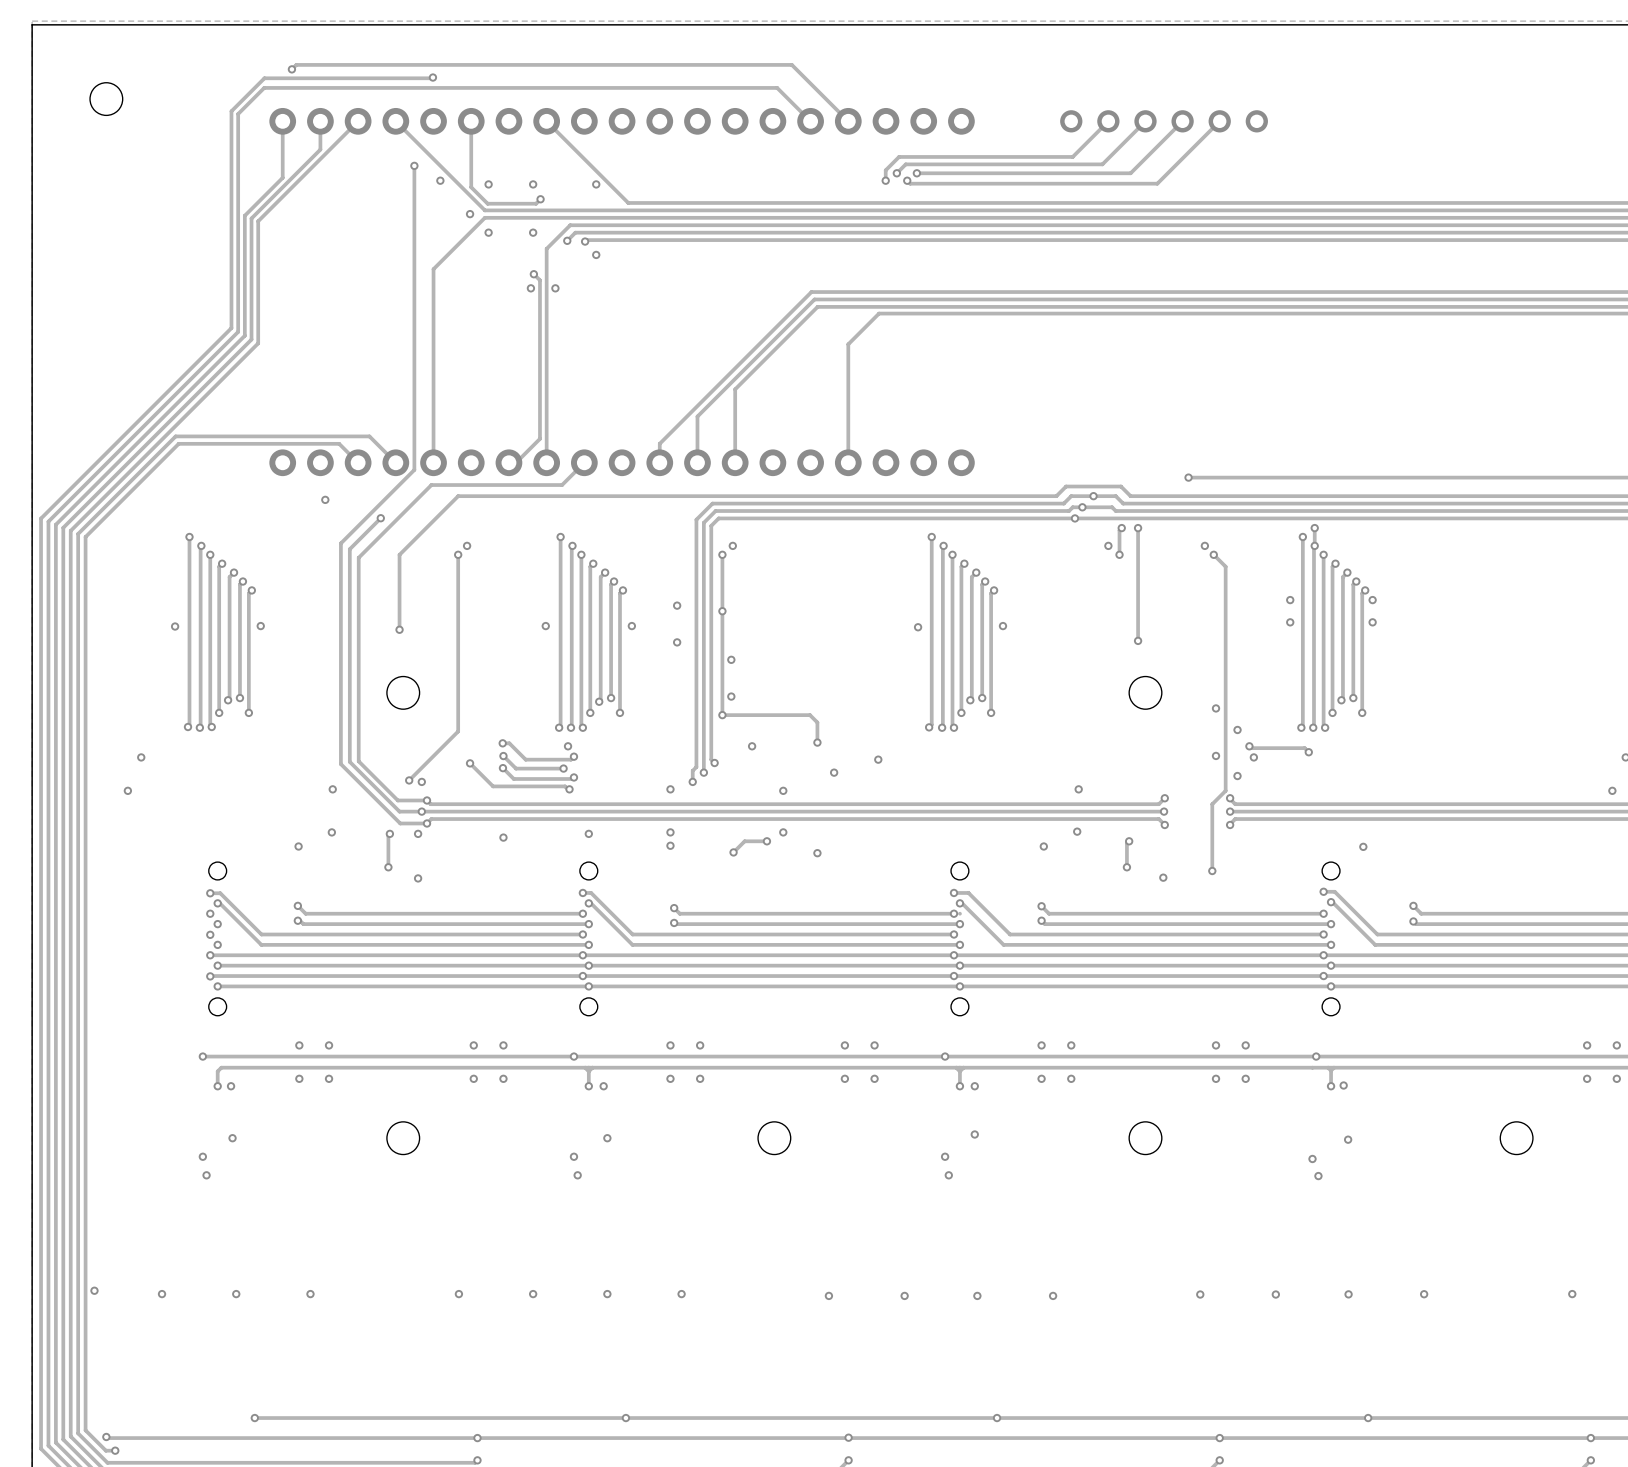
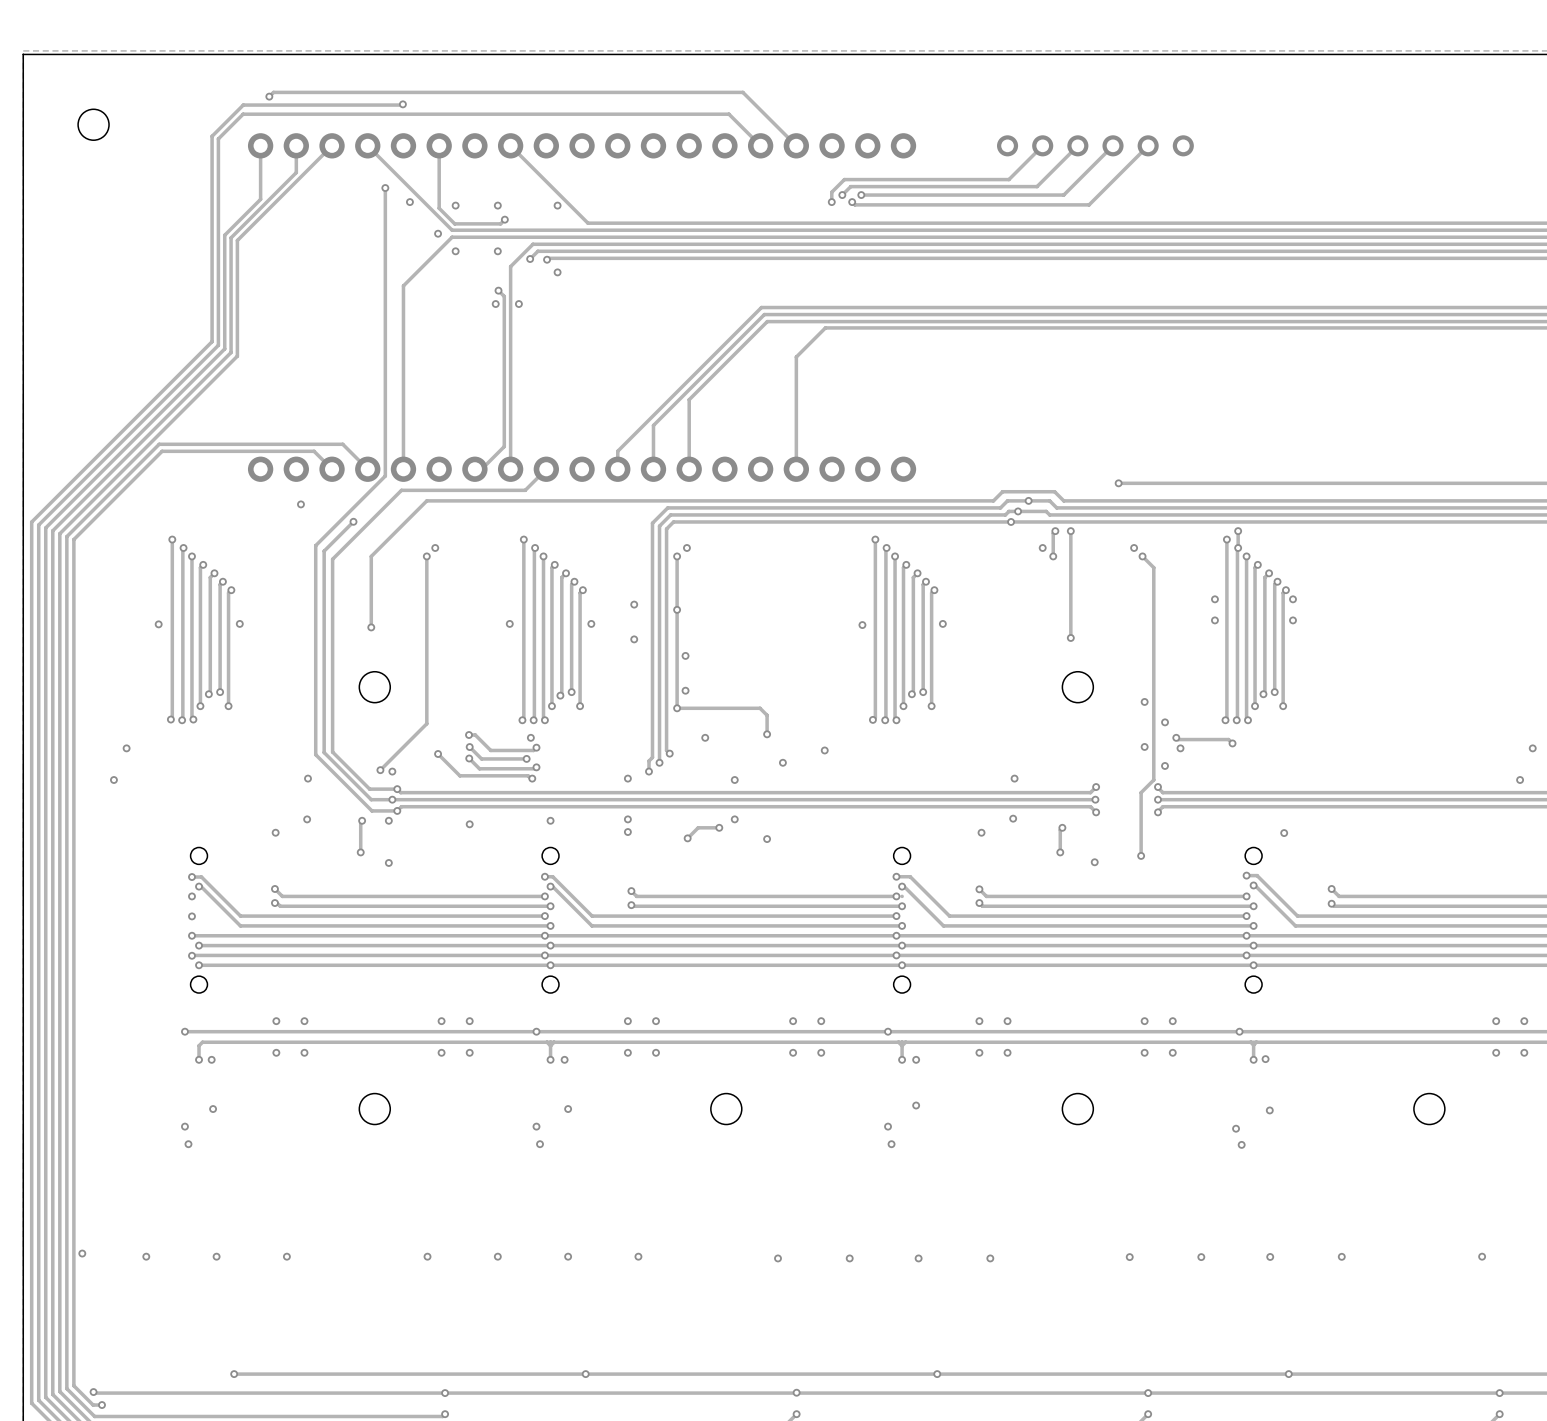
via: (217, 924) -> none
via: (217, 944) -> none

